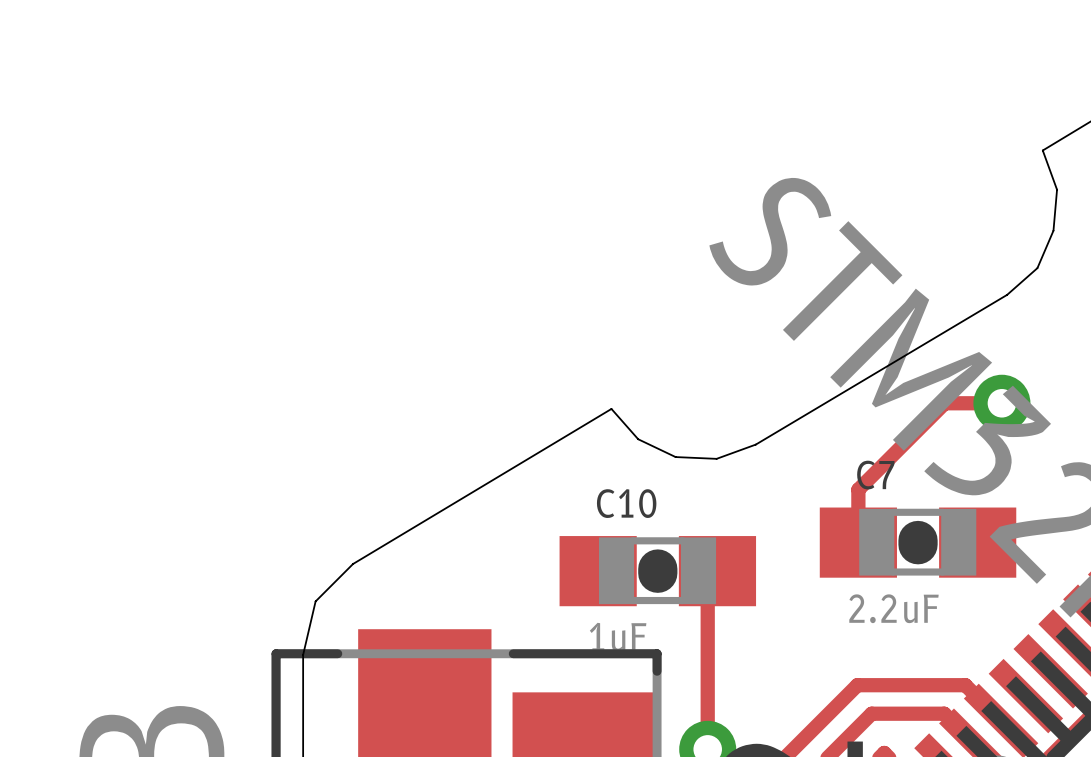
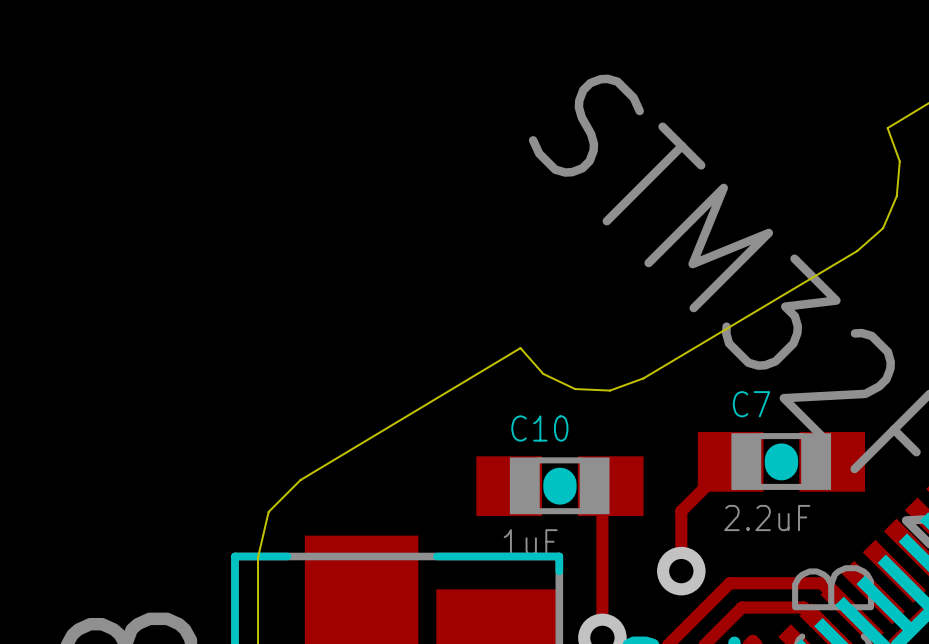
track: (1001, 403) (944, 403) (858, 489) (858, 542) -> (681, 571) (681, 511) (730, 461)
via: (1001, 403) -> none
via: none -> (681, 571)

